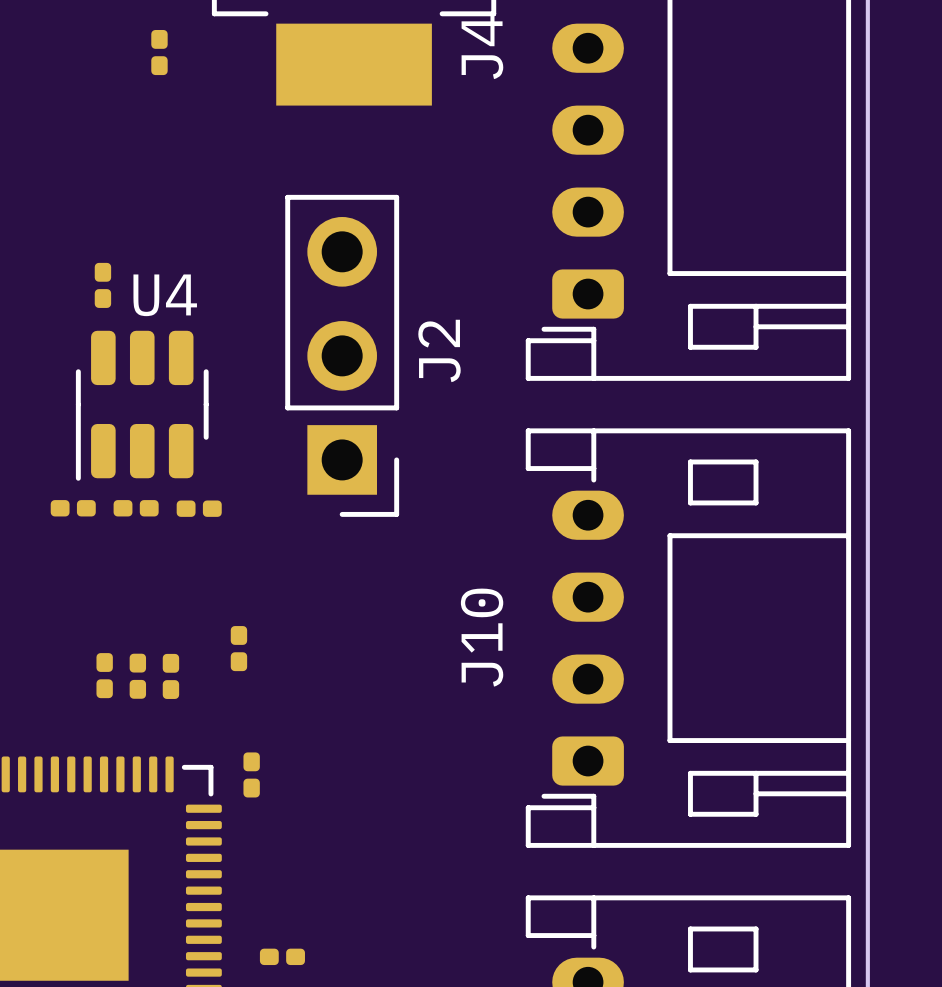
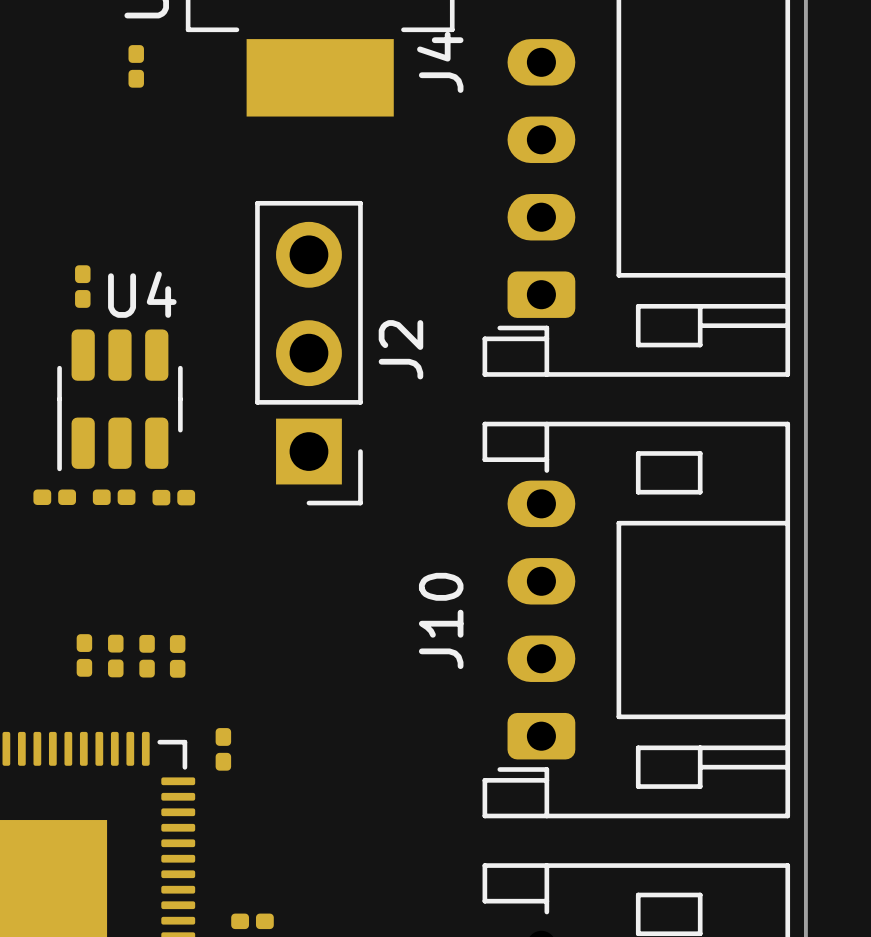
part position: (238, 648) -> (177, 656)

